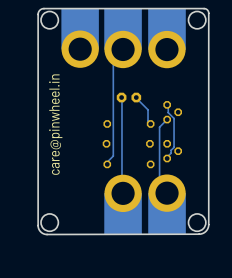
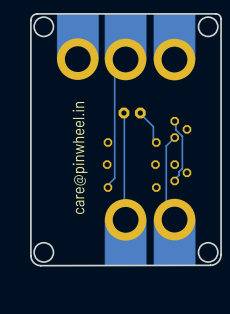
text position: care@pinwheel.in (55, 124) -> care@pinwheel.in (80, 157)

